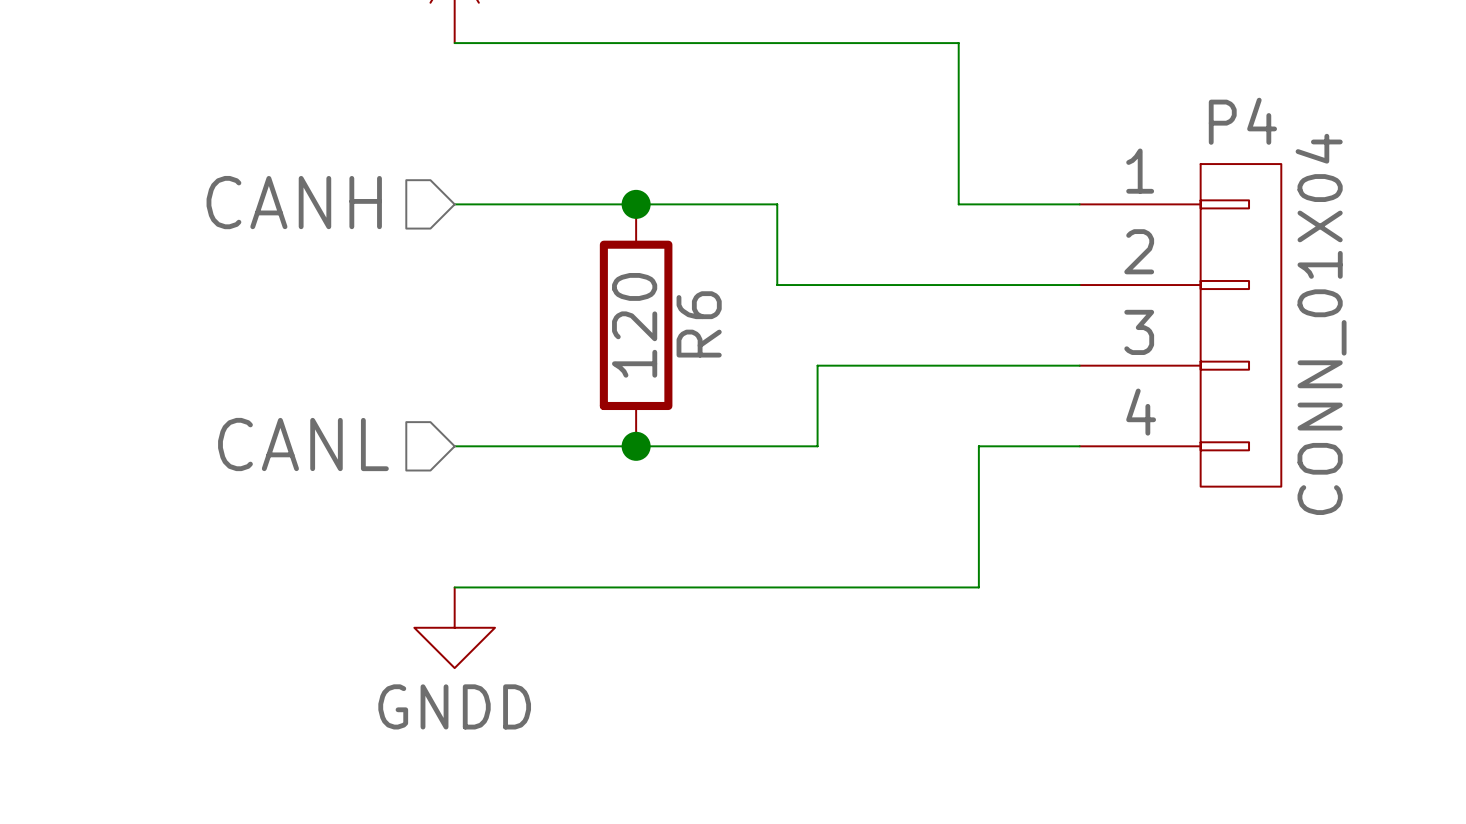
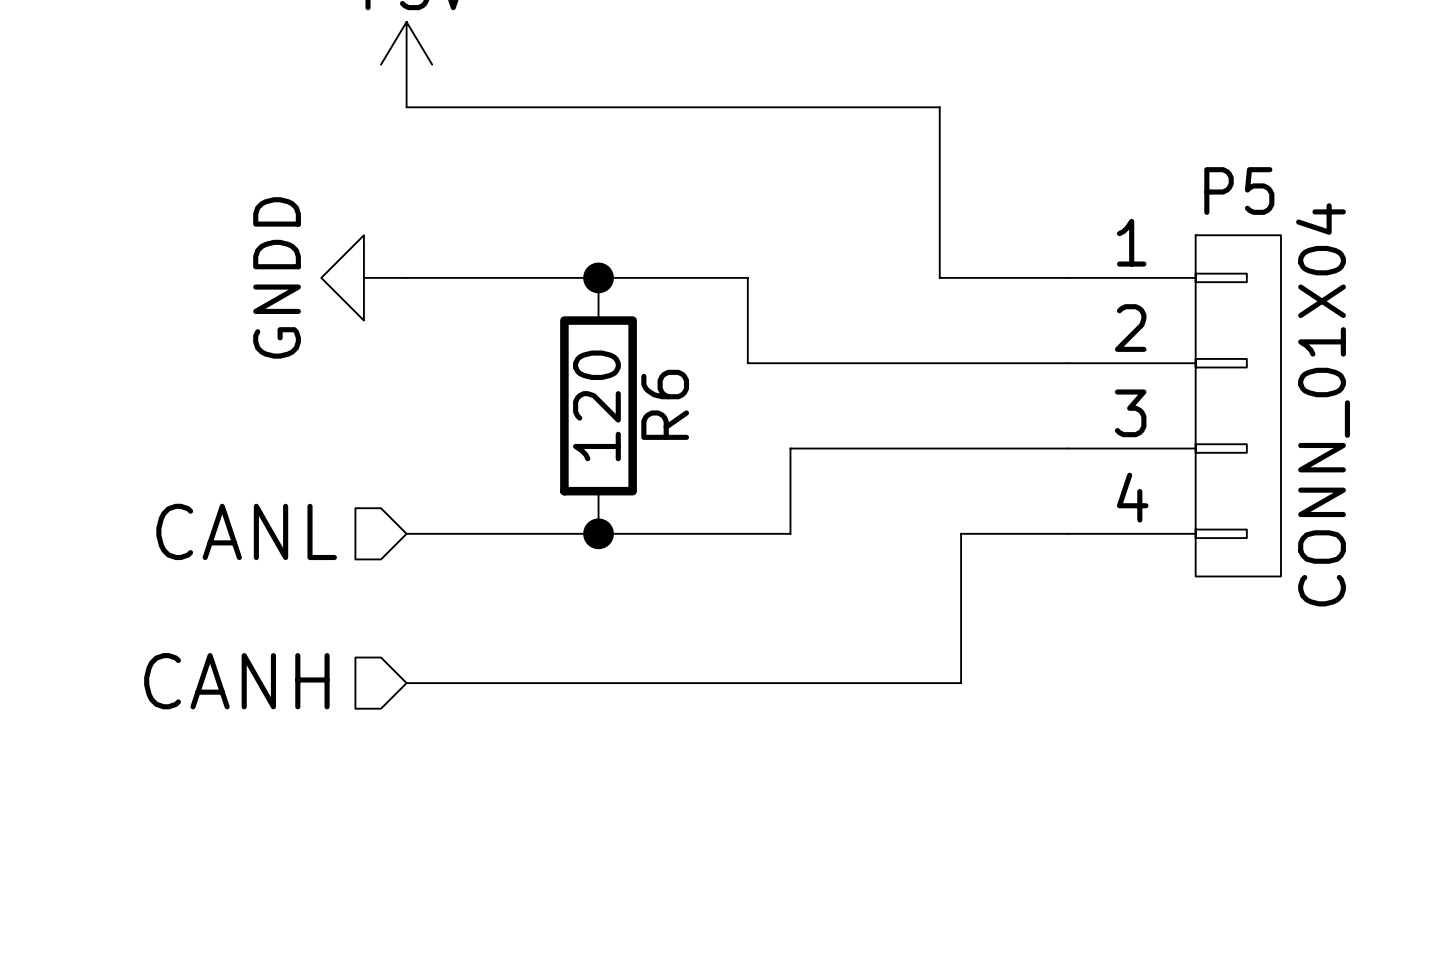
P4 name: P4 (1242, 121) -> P5 (1239, 191)
hierarchical label position: CANH (294, 202) -> CANH (236, 681)
power symbol rotation: 0° (454, 627) -> 90° clockwise (363, 277)
power symbol position: GNDD (454, 627) -> GNDD (363, 277)

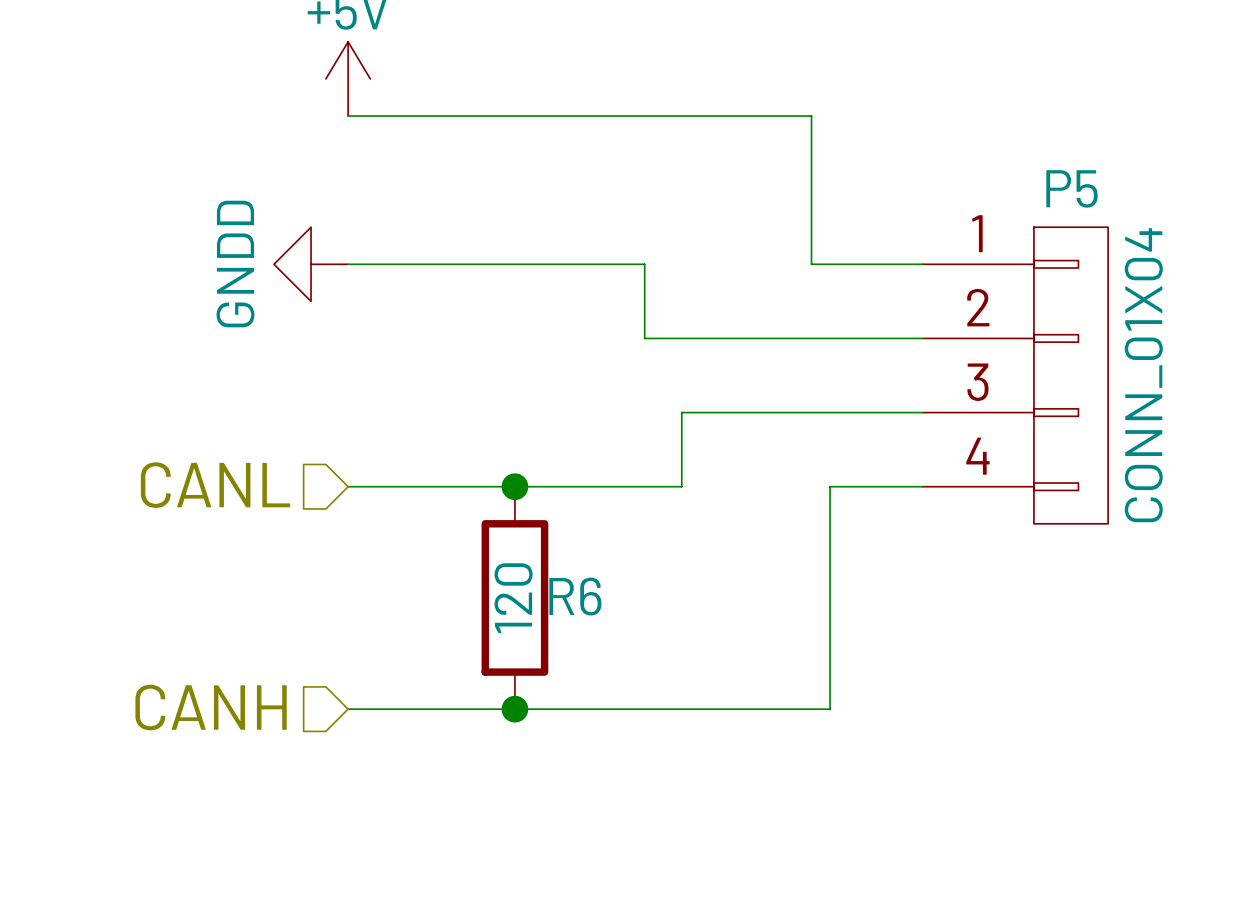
junction: (598, 277) -> none
R6 name rotation: 0° (665, 404) -> 90° clockwise (575, 596)
R6 position: (598, 405) -> (514, 597)
hierarchical label position: CANH (236, 681) -> CANH (211, 707)
wire: (406, 683) (961, 683) -> (348, 709) (830, 709) (830, 616)
junction: none -> (514, 709)

